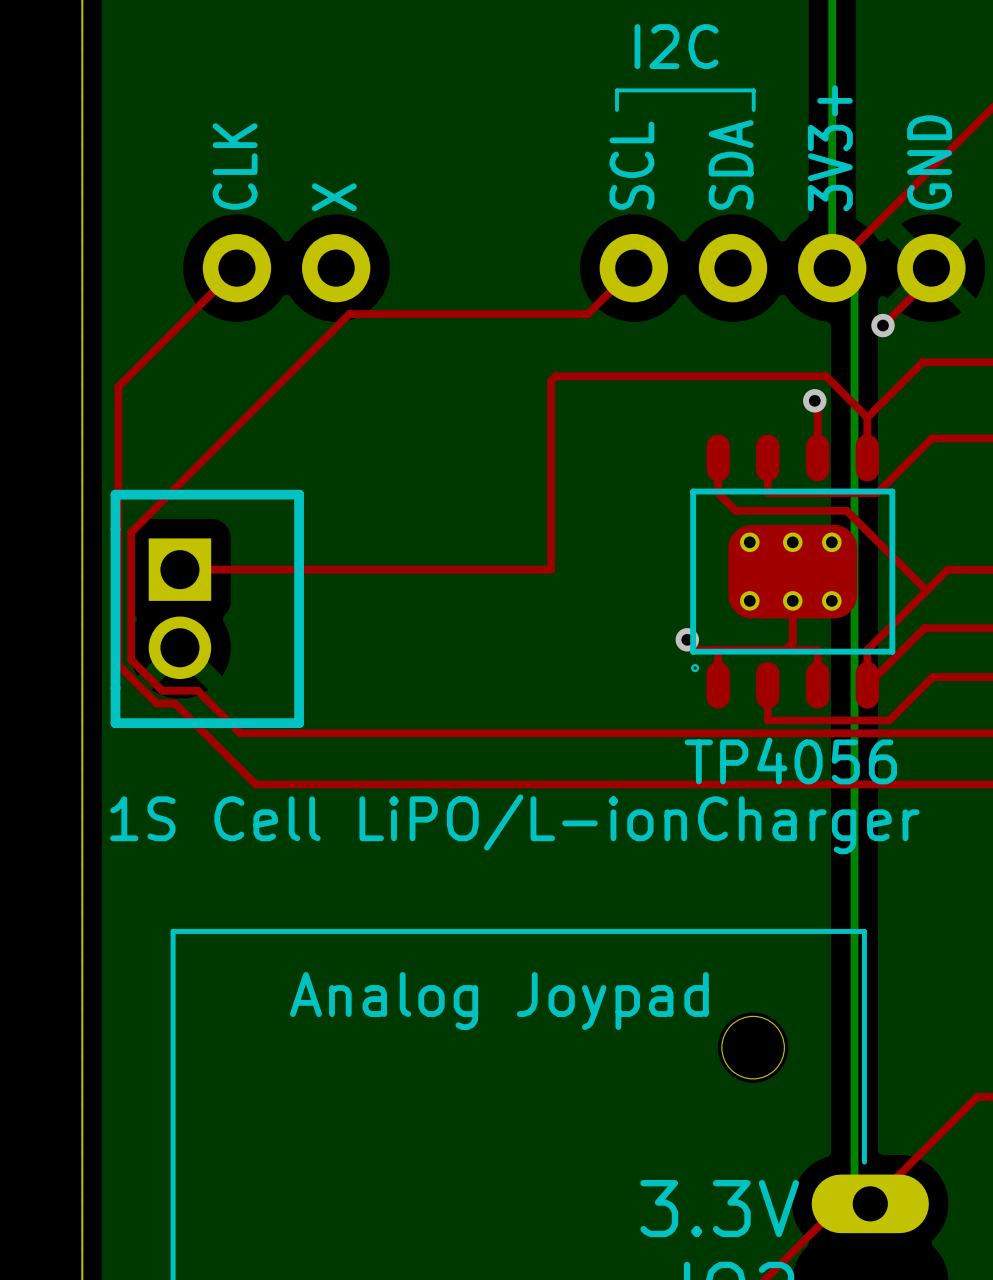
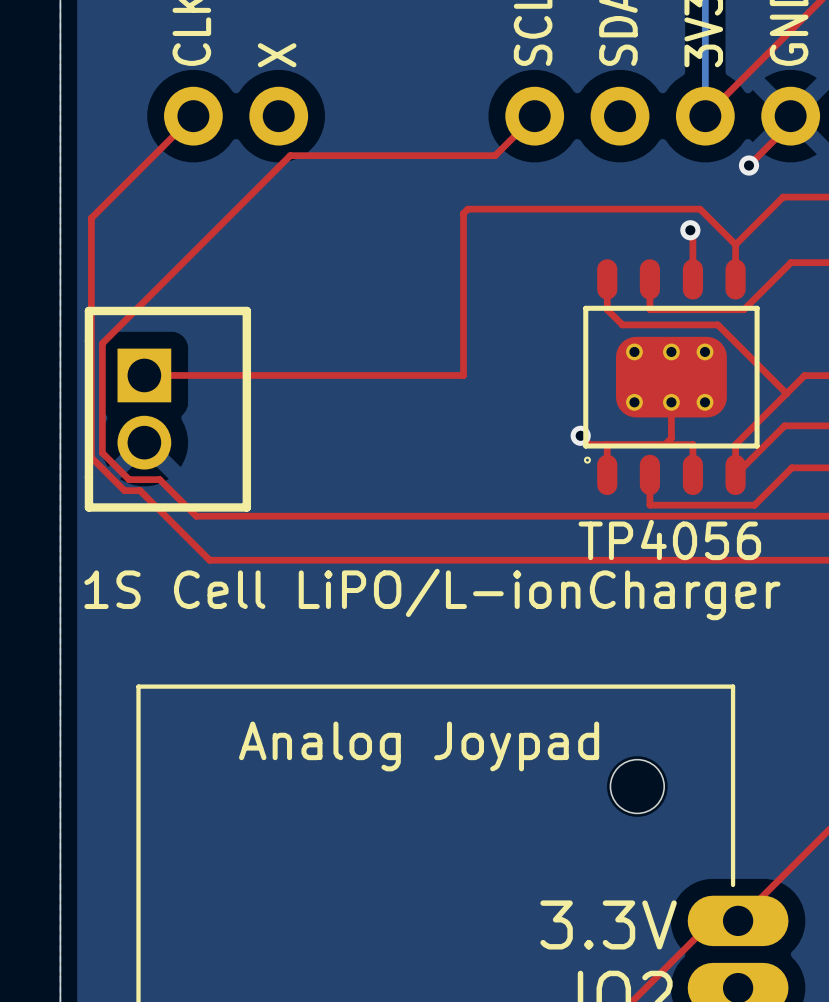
bottom track: (832, 268) (854, 290) (854, 1188) (870, 1203) -> none

